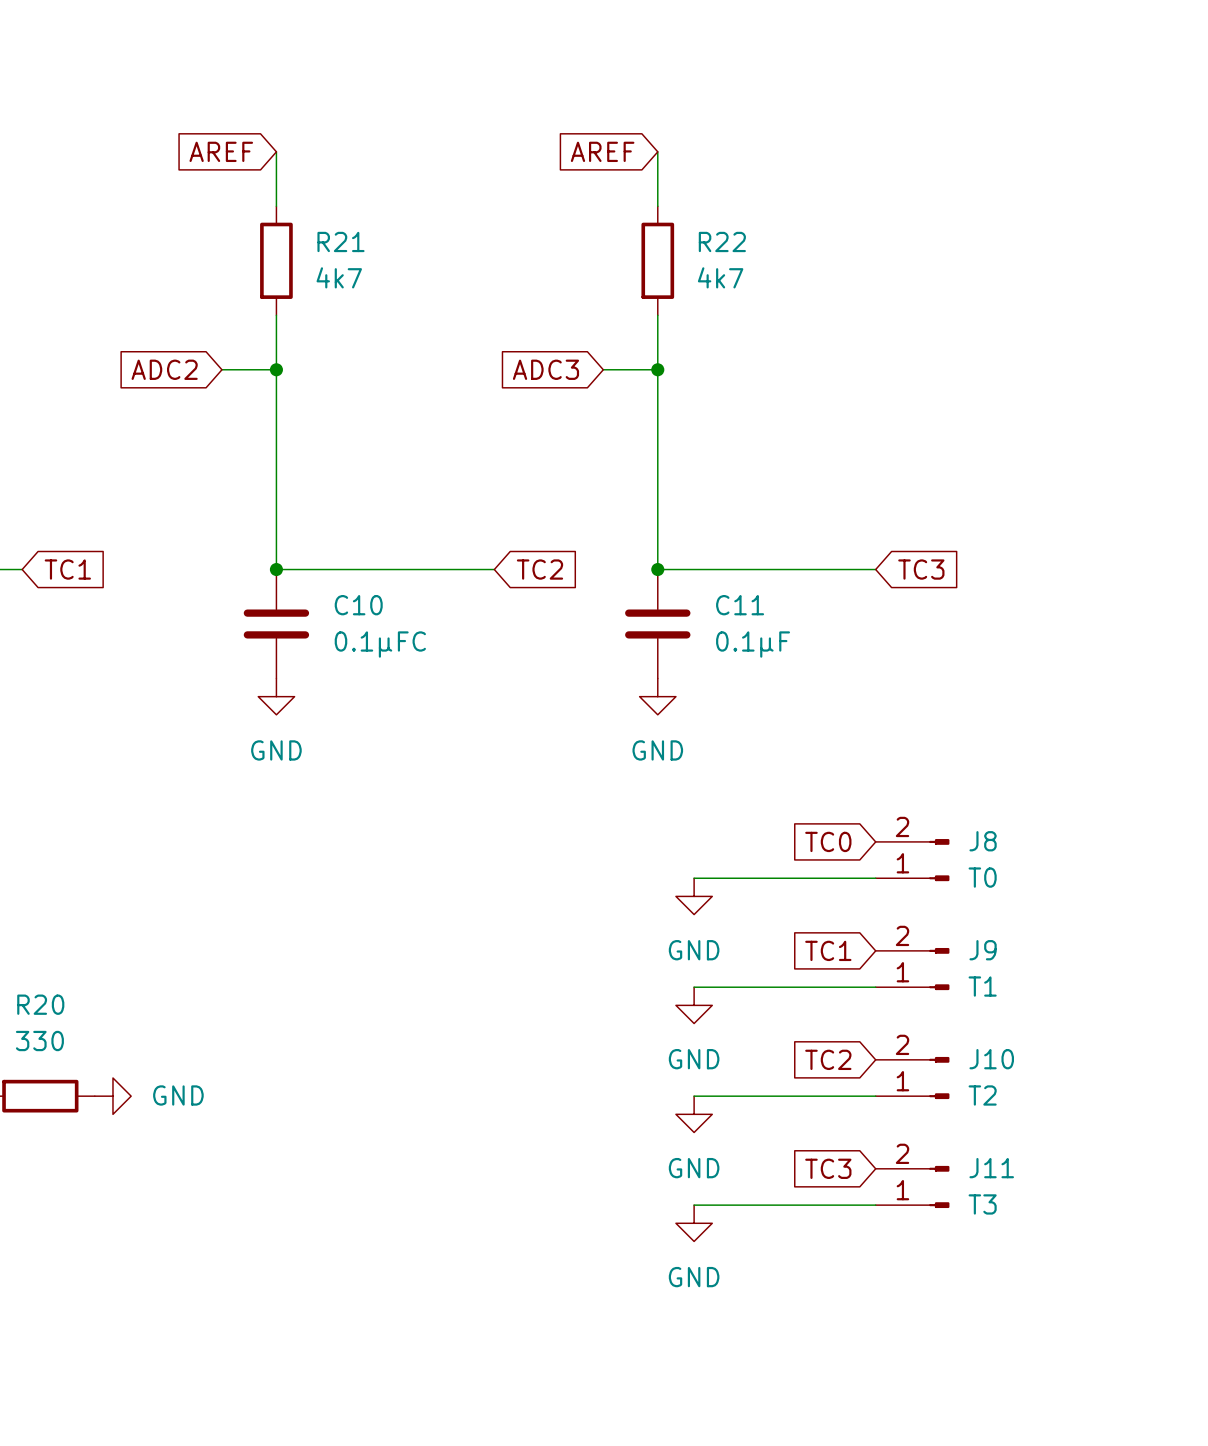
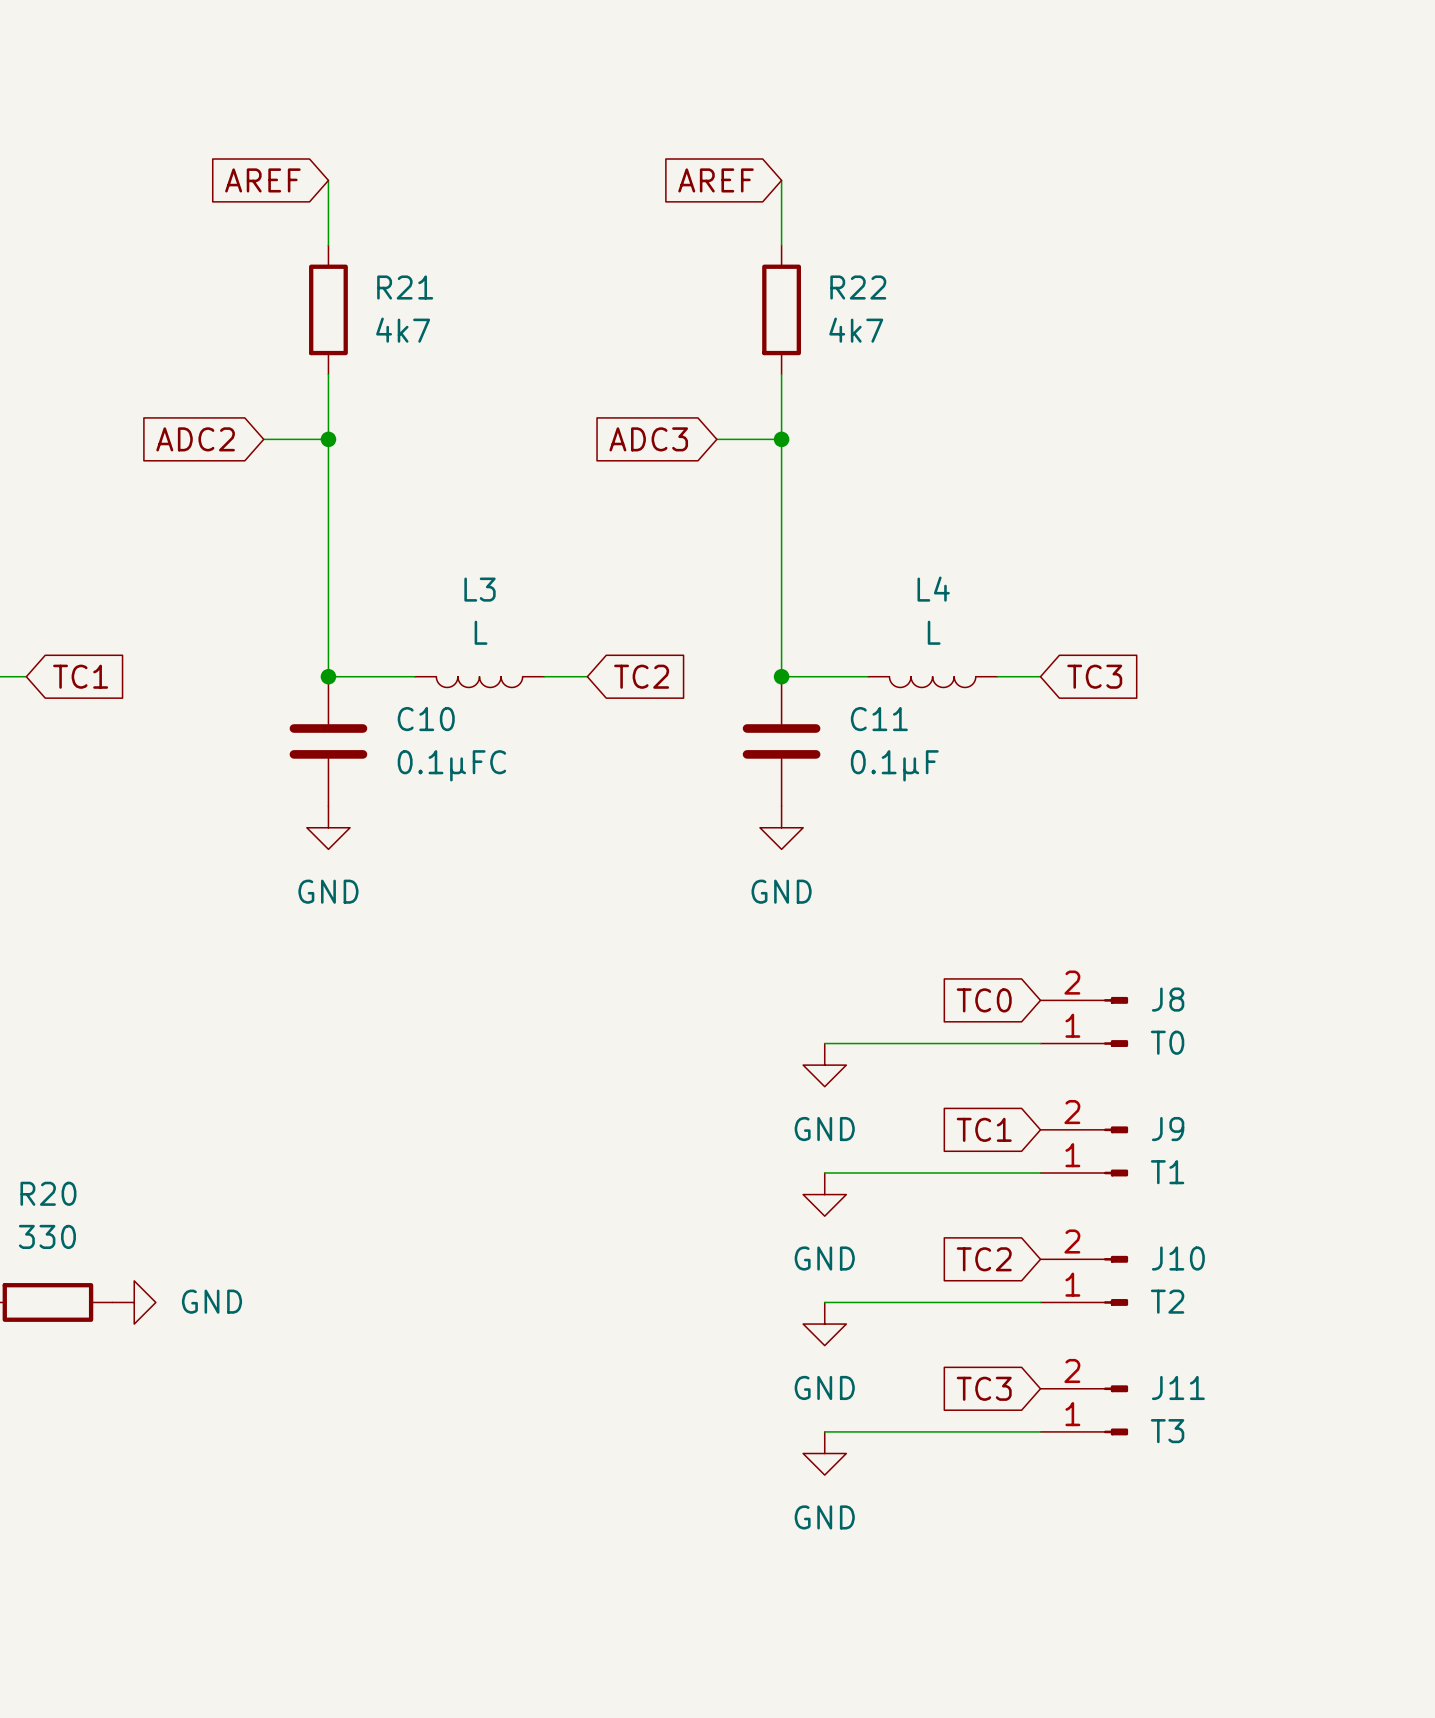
wire: (349, 569) (458, 569) -> none
wire: (730, 569) (839, 569) -> none
L3: none -> L (479, 682)
L4: none -> L (932, 682)

